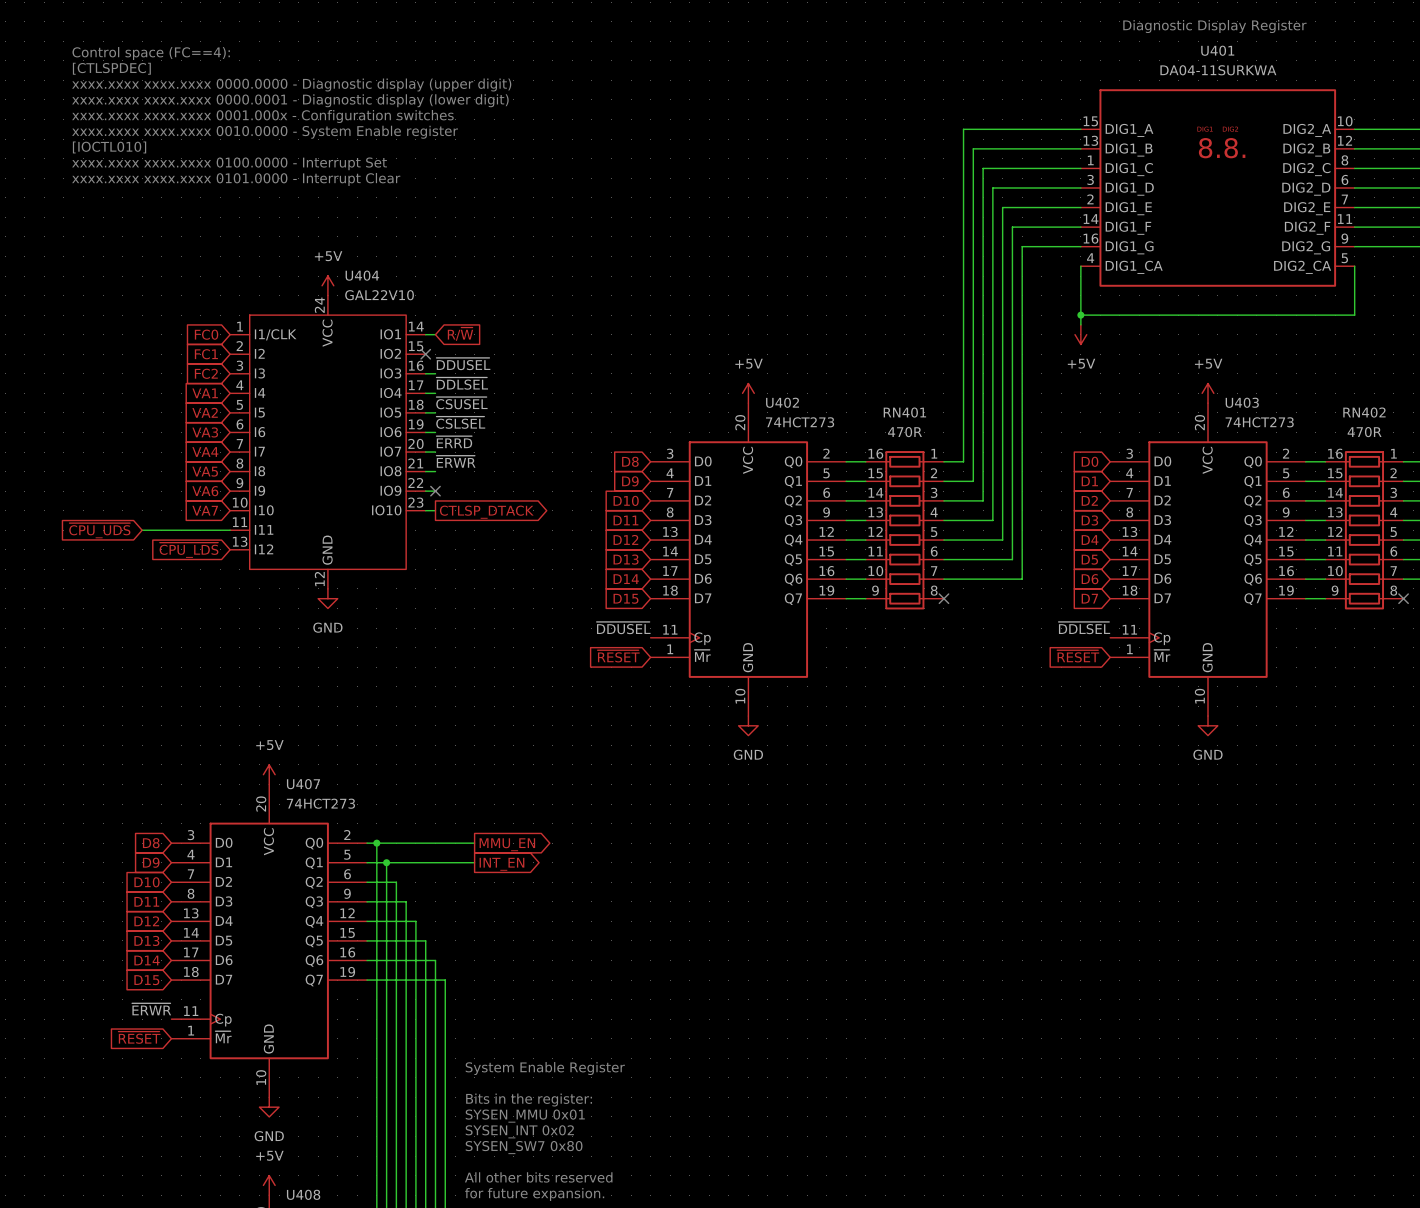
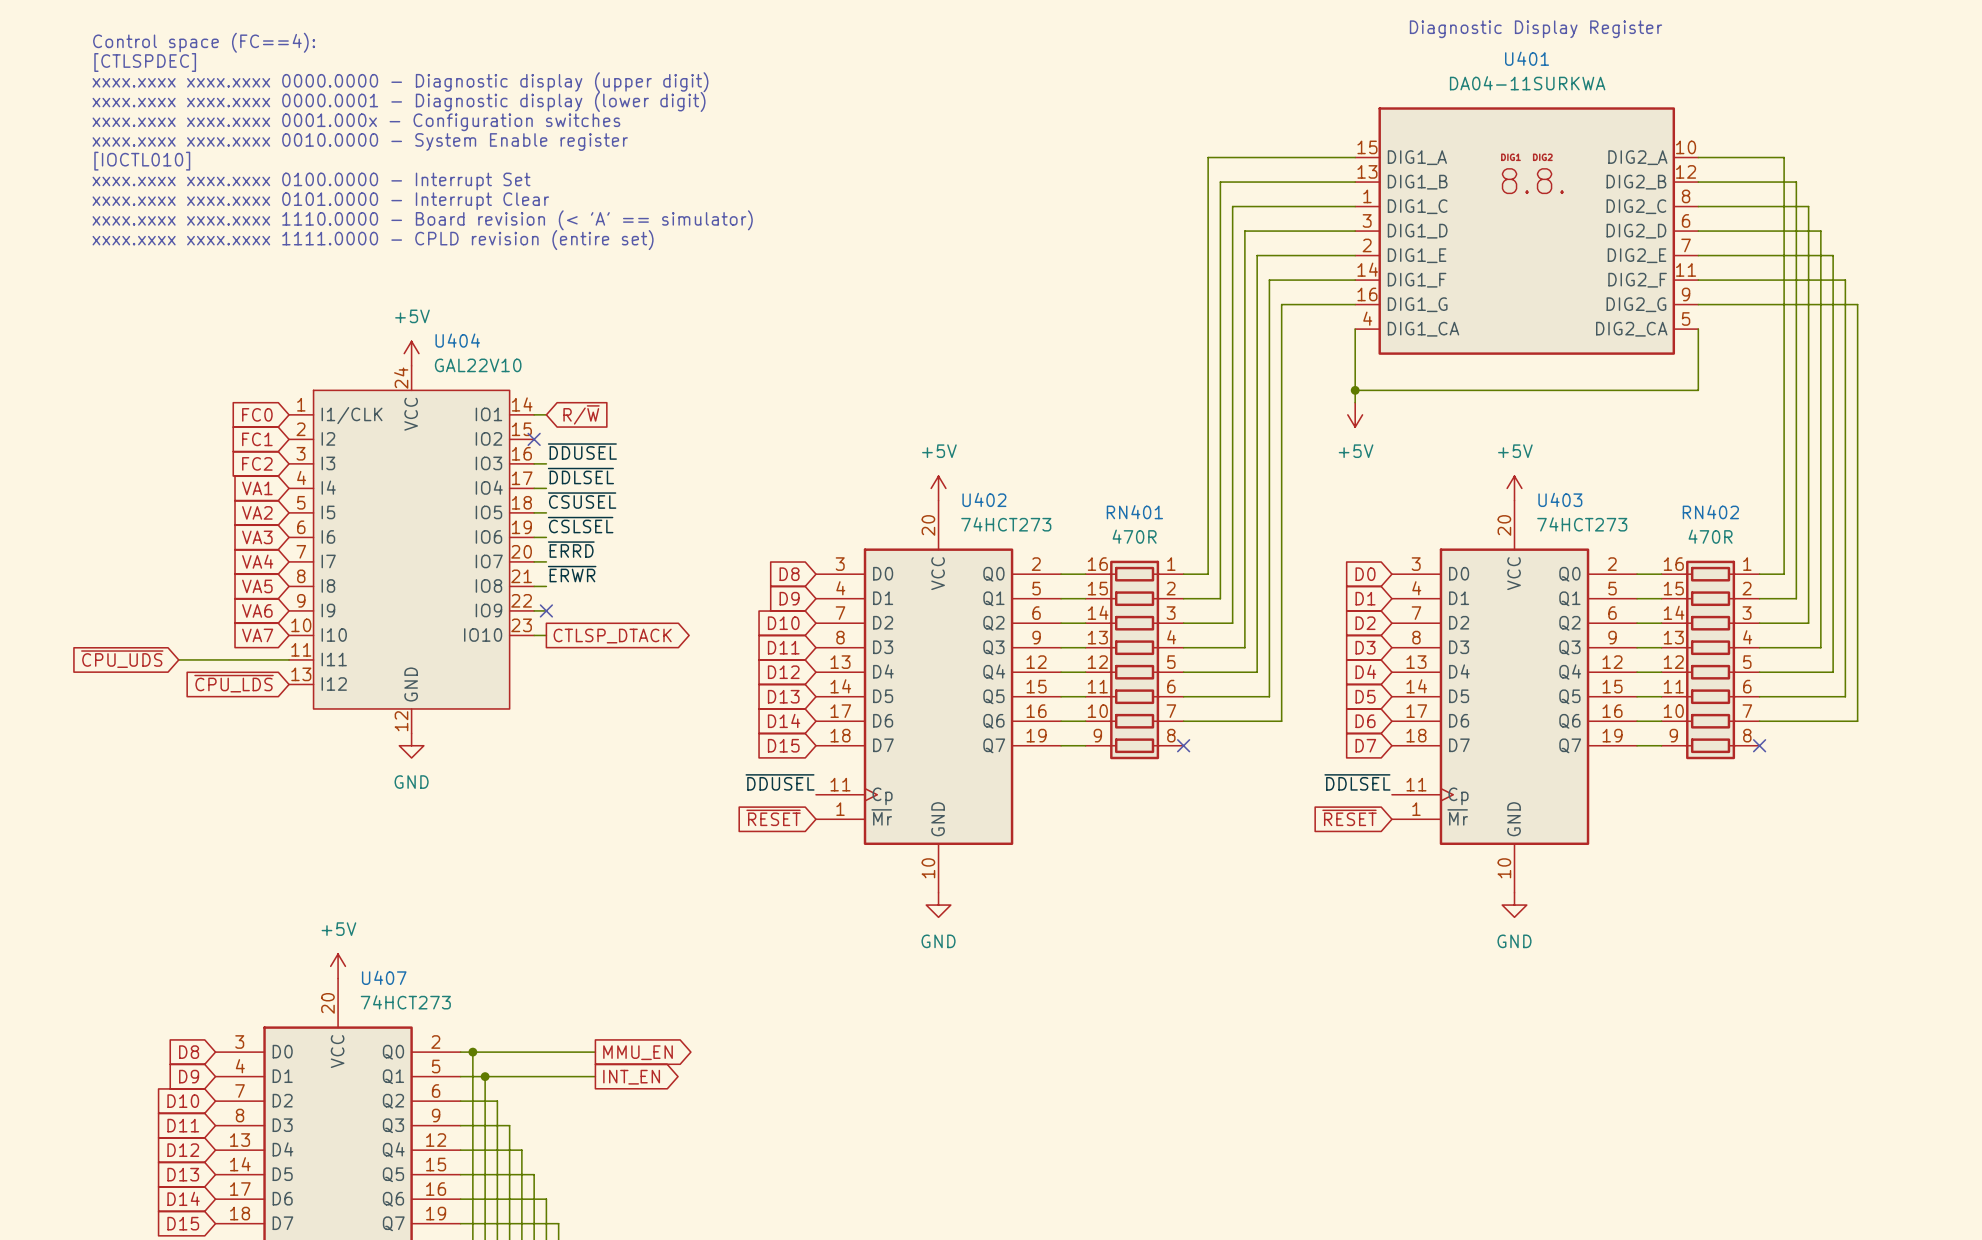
text: none -> Control space (FC==4): (204, 42)
text: Control space (FC==4): (151, 53) -> [CTLSPDEC] (145, 62)
text: [CTLSPDEC] (111, 68) -> xxxx.xxxx xxxx.xxxx 0000.0000 - Diagnostic display (upper digit) (400, 82)
text: xxxx.xxxx xxxx.xxxx 0000.0000 - Diagnostic display (upper digit) (291, 85) -> xxxx.xxxx xxxx.xxxx 0000.0001 - Diagnostic display (lower digit) (399, 101)
text: xxxx.xxxx xxxx.xxxx 0000.0001 - Diagnostic display (lower digit) (290, 100) -> xxxx.xxxx xxxx.xxxx 0001.000x - Configuration switches (356, 122)
text: xxxx.xxxx xxxx.xxxx 0001.000x - Configuration switches (262, 116) -> xxxx.xxxx xxxx.xxxx 0010.0000 - System Enable register (360, 141)
text: xxxx.xxxx xxxx.xxxx 0010.0000 - System Enable register (265, 132) -> [IOCTL010] (142, 161)
text: [IOCTL010] (109, 147) -> xxxx.xxxx xxxx.xxxx 0100.0000 - Interrupt Set (311, 181)
text: xxxx.xxxx xxxx.xxxx 0100.0000 - Interrupt Set (229, 163) -> xxxx.xxxx xxxx.xxxx 0101.0000 - Interrupt Clear (320, 201)
text: xxxx.xxxx xxxx.xxxx 0101.0000 - Interrupt Clear (236, 179) -> xxxx.xxxx xxxx.xxxx 1110.0000 - Board revision (< 'A' == simulator) (422, 220)
text: none -> xxxx.xxxx xxxx.xxxx 1111.0000 - CPLD revision (entire set) (373, 240)

